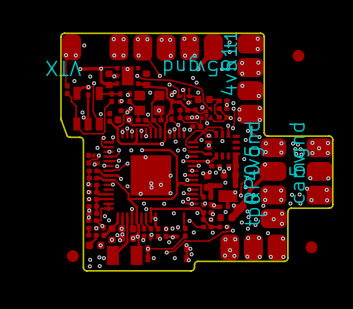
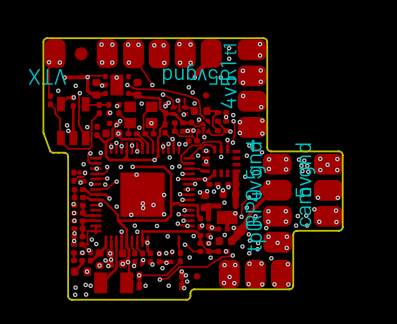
via: (84, 45) -> none
part: none -> (81, 53)
part: (298, 55) -> none
part: none -> (206, 95)
part: (311, 247) -> none
part: none -> (196, 276)
part: (72, 256) -> none

